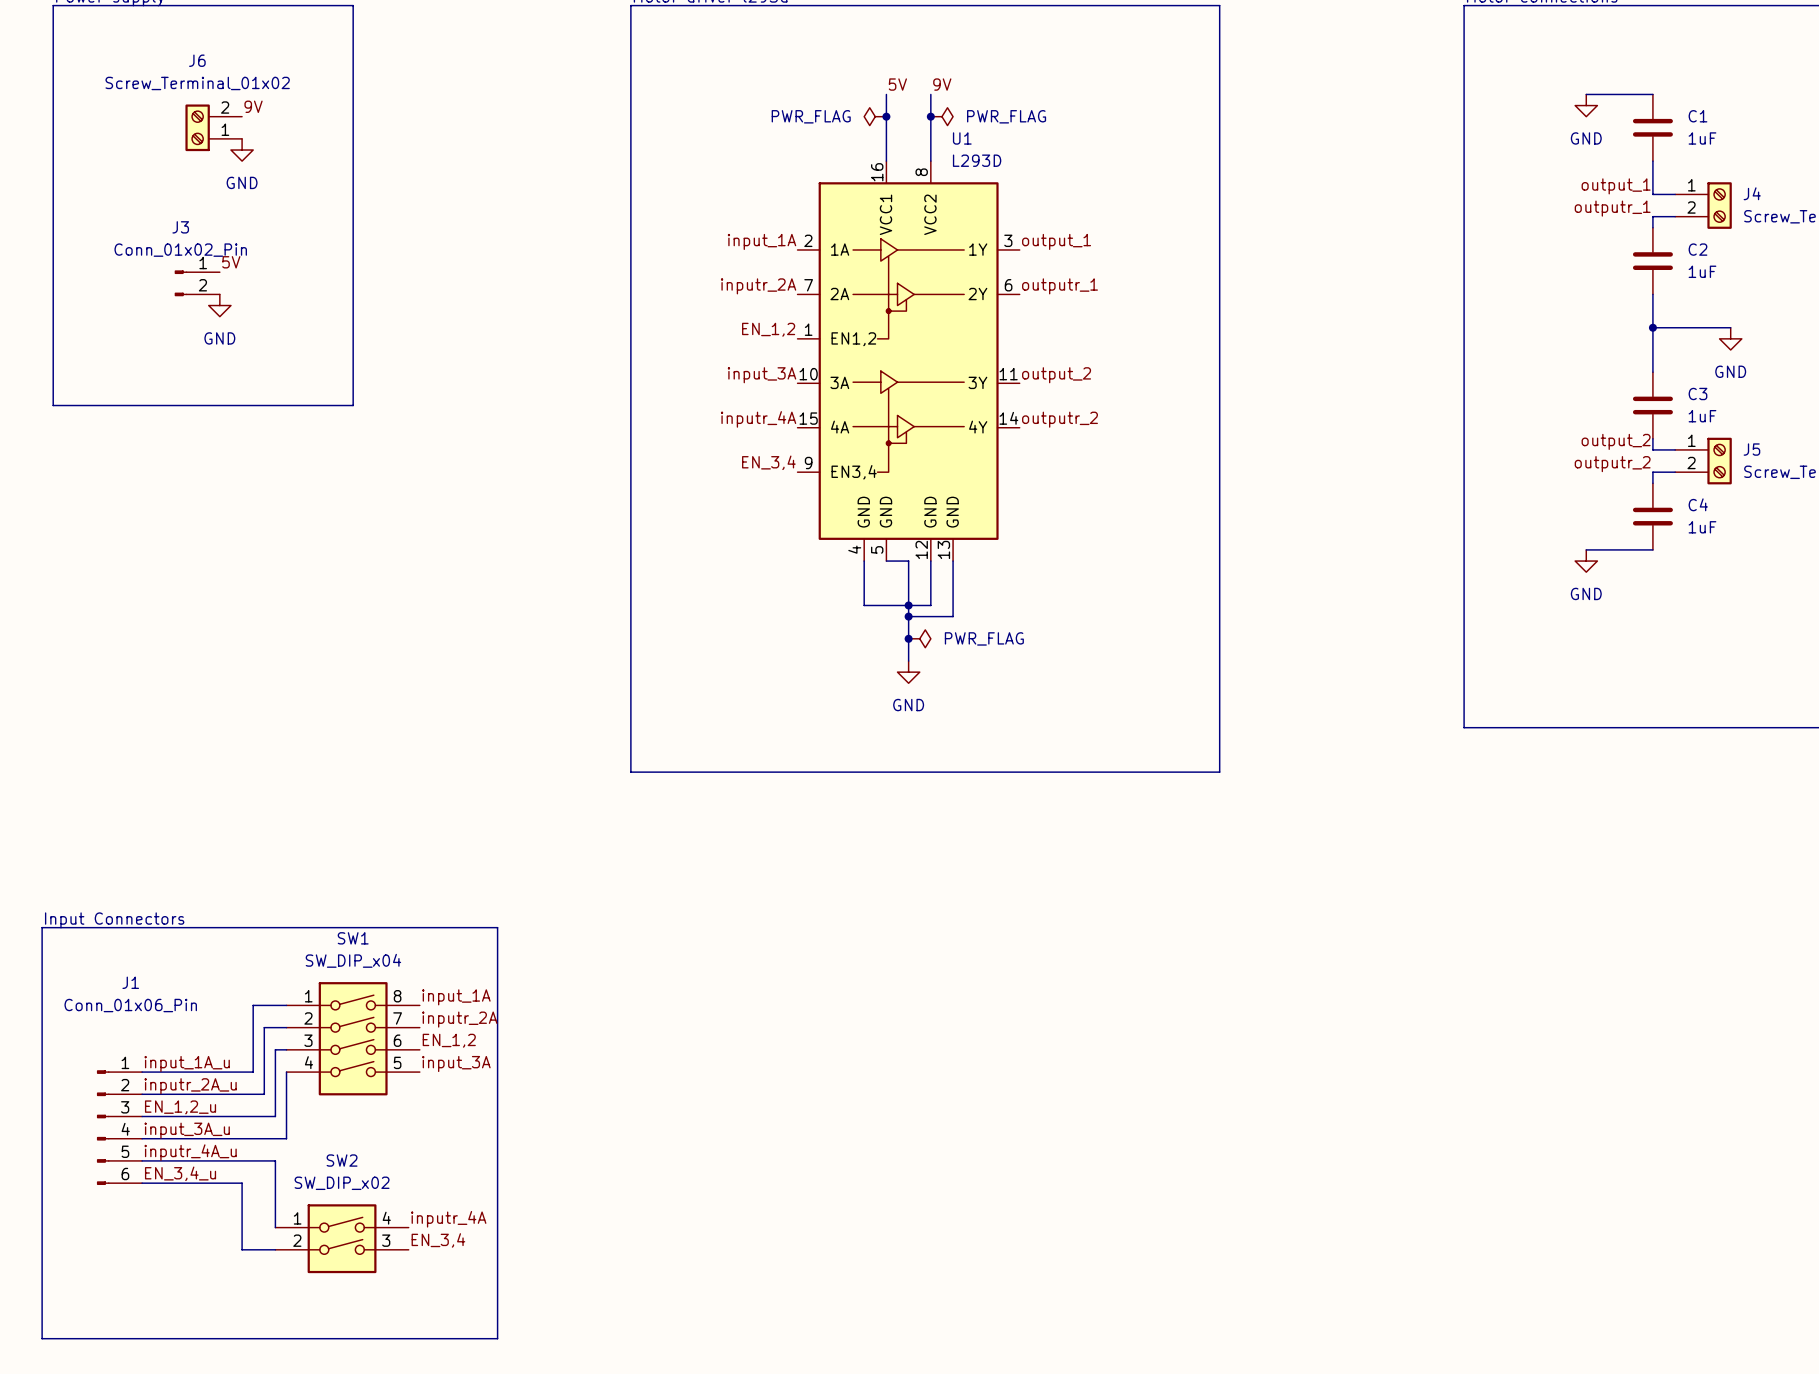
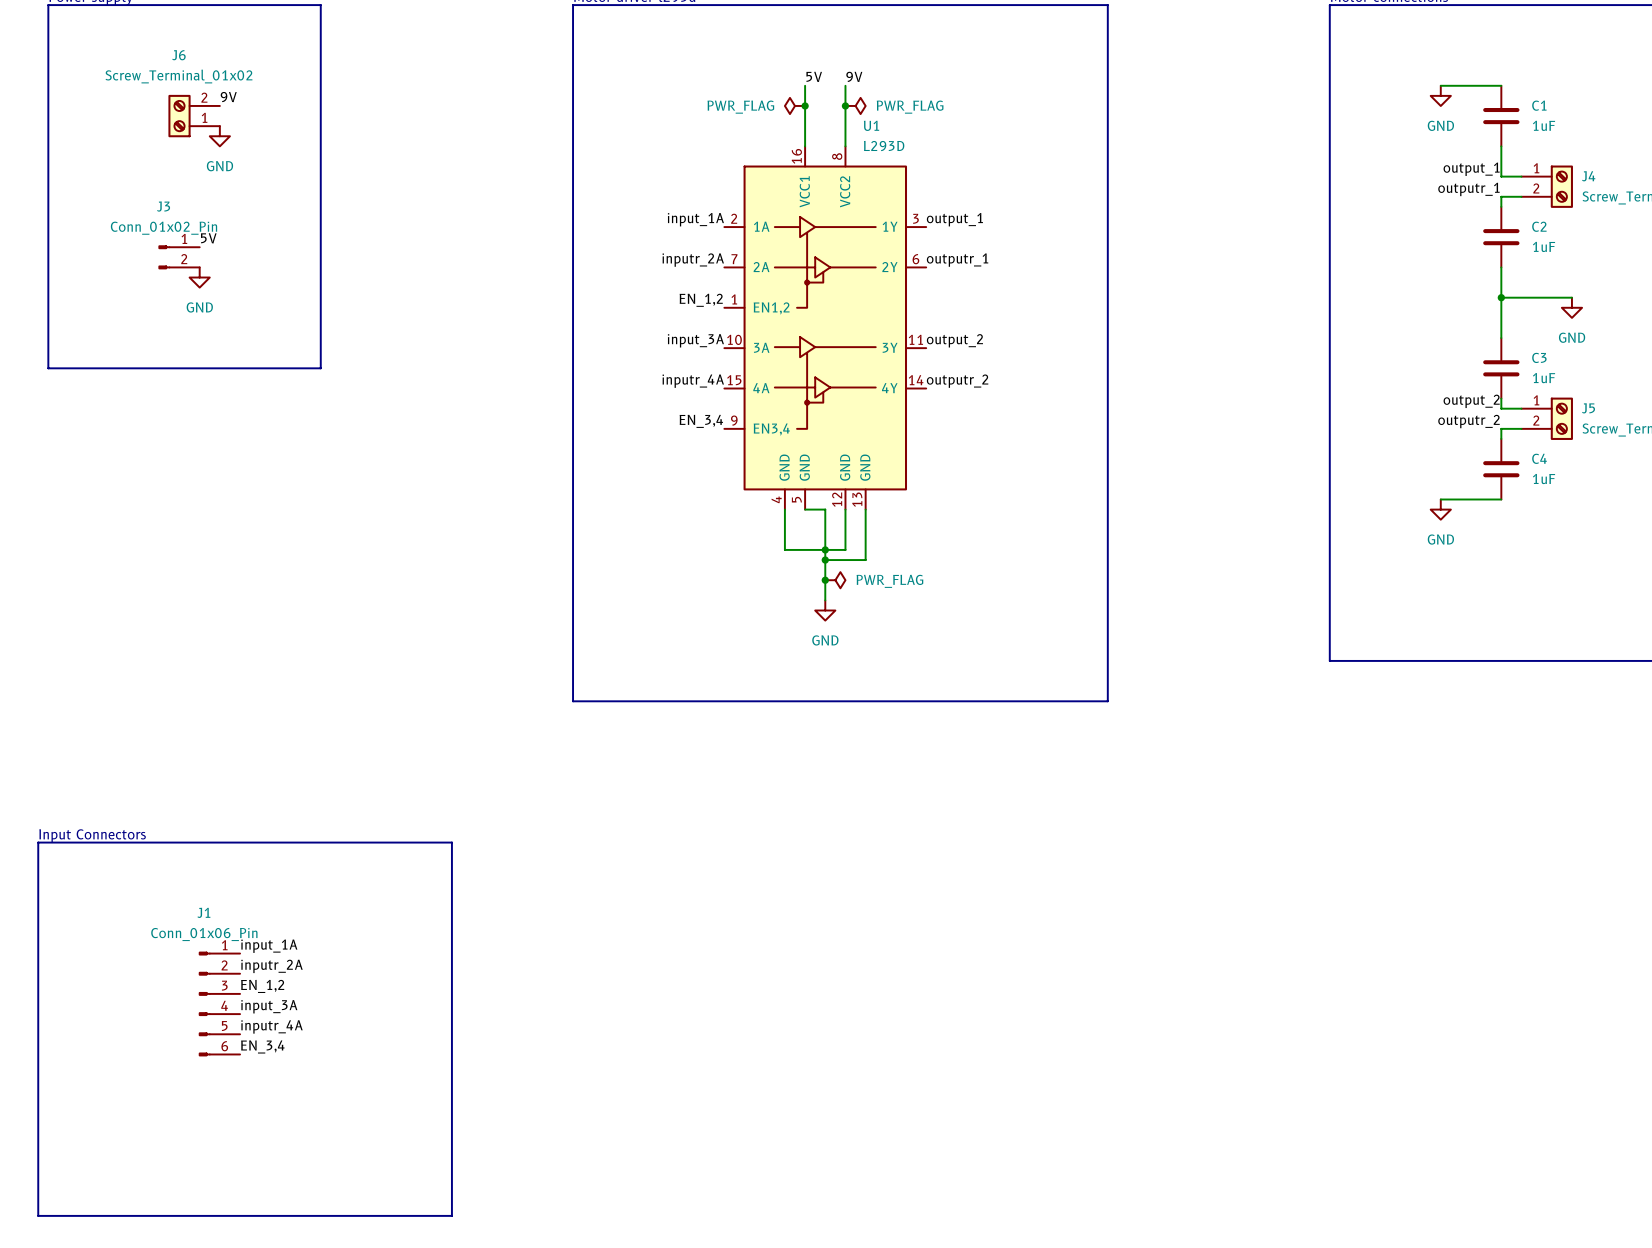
J1 name position: J1 (130, 982) -> J1 (203, 912)
label position: input_1A (456, 997) -> input_1A (269, 946)
J1 value position: Conn_01x06_Pin (130, 1005) -> Conn_01x06_Pin (204, 934)
wire: (286, 1005) (253, 1005) (253, 1072) (142, 1072) -> none
label position: inputr_2A (459, 1019) -> inputr_2A (272, 966)
wire: (286, 1027) (264, 1027) (264, 1094) (142, 1094) -> none
SW1: SW_DIP_x04 (353, 1038) -> none
label position: EN_1,2 (449, 1040) -> EN_1,2 (262, 986)
wire: (286, 1049) (275, 1049) (275, 1116) (142, 1116) -> none
label: input_1A_u (187, 1064) -> none
label position: input_3A (456, 1064) -> input_3A (269, 1006)
wire: (286, 1072) (286, 1138) (142, 1138) -> none
label: inputr_2A_u (190, 1086) -> none
label: EN_1,2_u (180, 1107) -> none
J1 position: (119, 1127) -> (219, 1004)
label: input_3A_u (187, 1130) -> none
label: inputr_4A_u (190, 1152) -> none
wire: (142, 1160) (275, 1160) (275, 1227) -> none
label: EN_3,4_u (180, 1173) -> none
wire: (142, 1183) (242, 1183) (242, 1249) (275, 1249) -> none
label position: inputr_4A (448, 1219) -> inputr_4A (272, 1026)
SW2: SW_DIP_x02 (342, 1238) -> none
label position: EN_3,4 (438, 1240) -> EN_3,4 (262, 1046)

